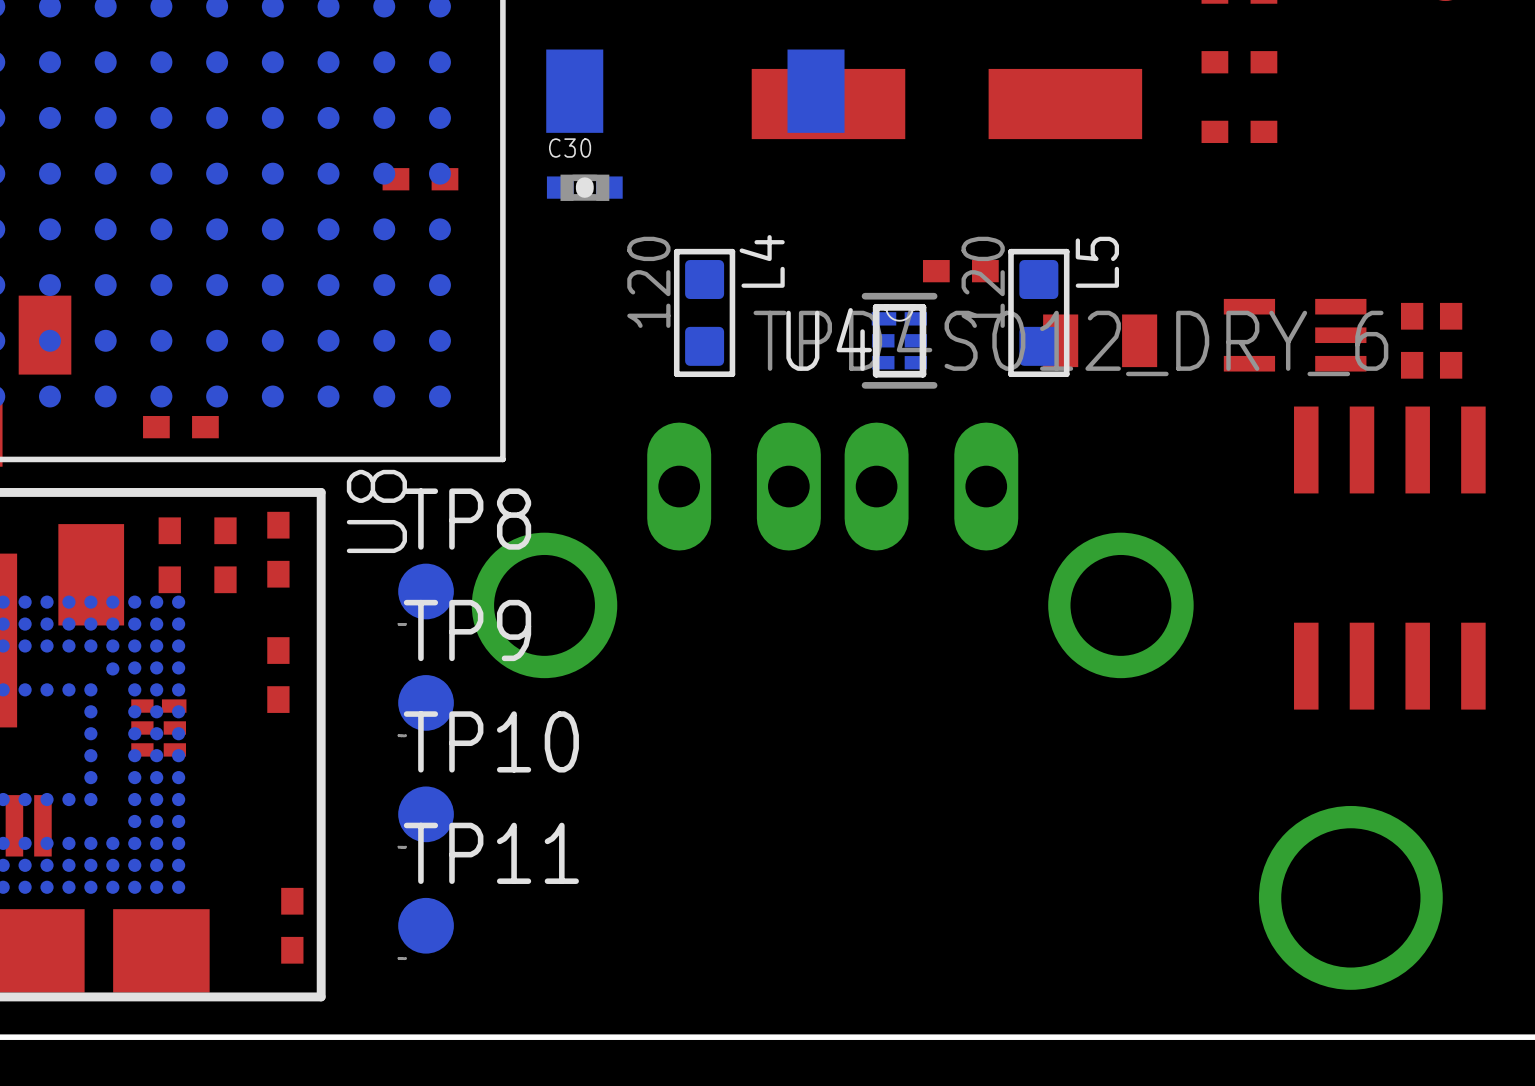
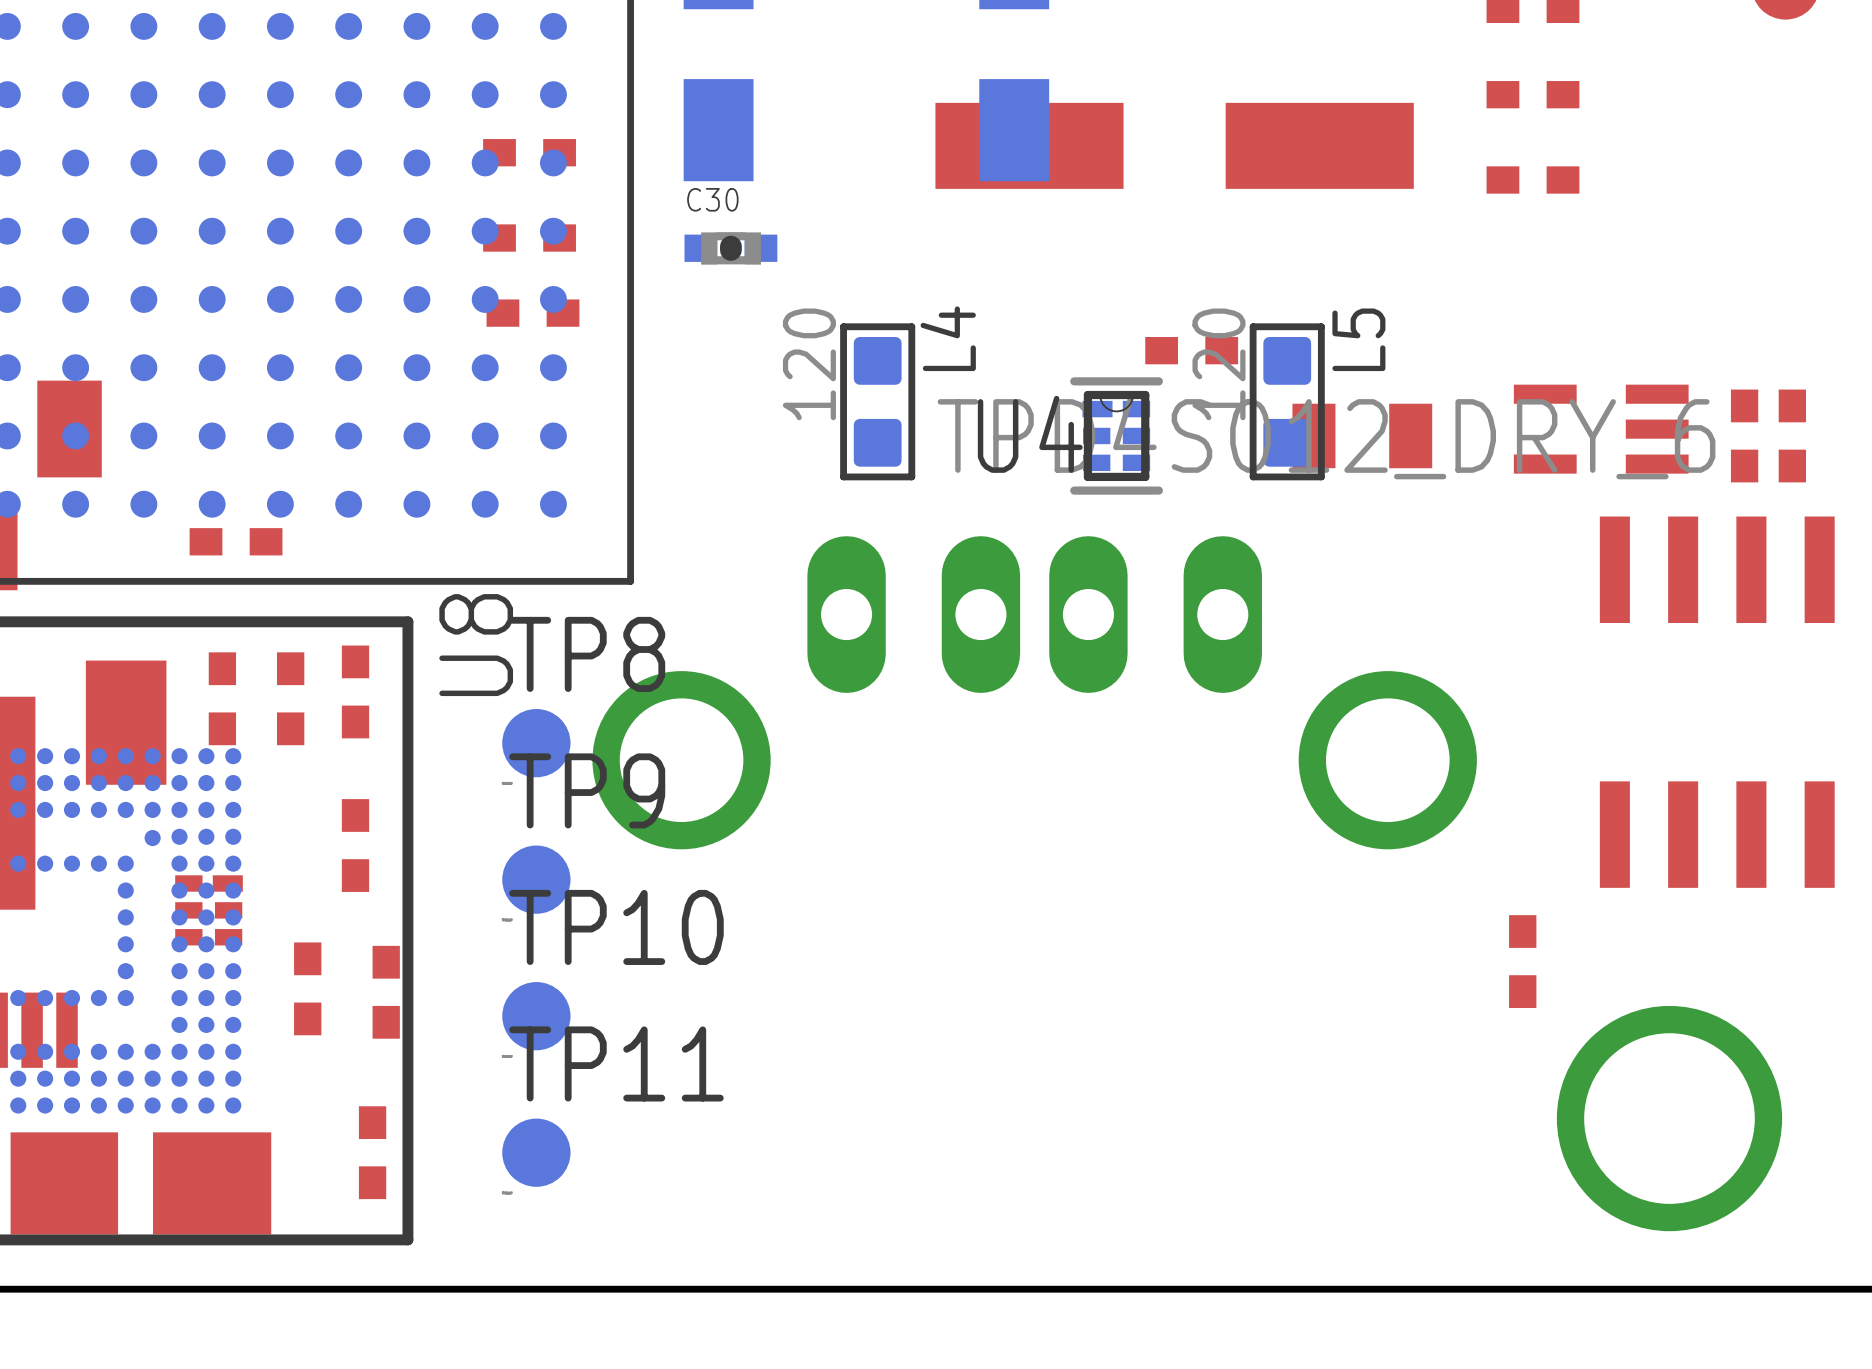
part: none -> (529, 152)
part: none -> (532, 313)
part: none -> (1522, 961)
part: none -> (307, 988)
part: none -> (386, 992)

